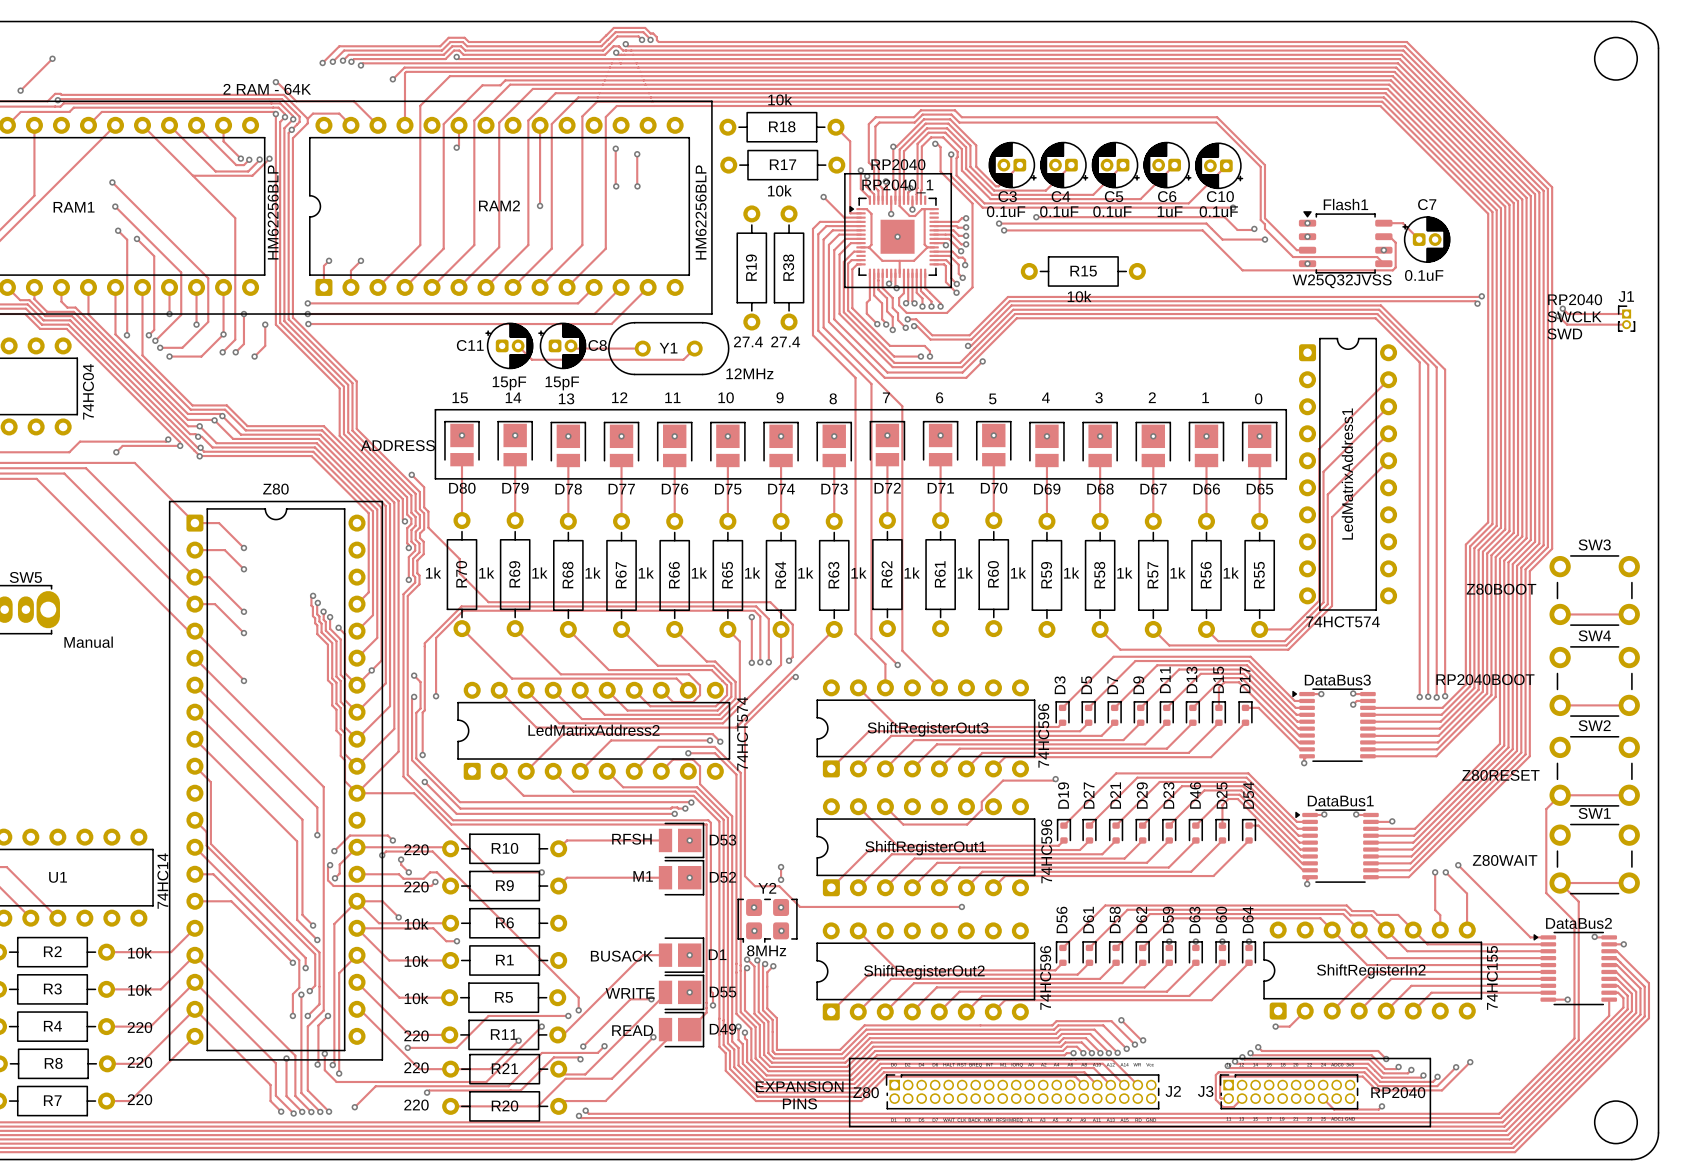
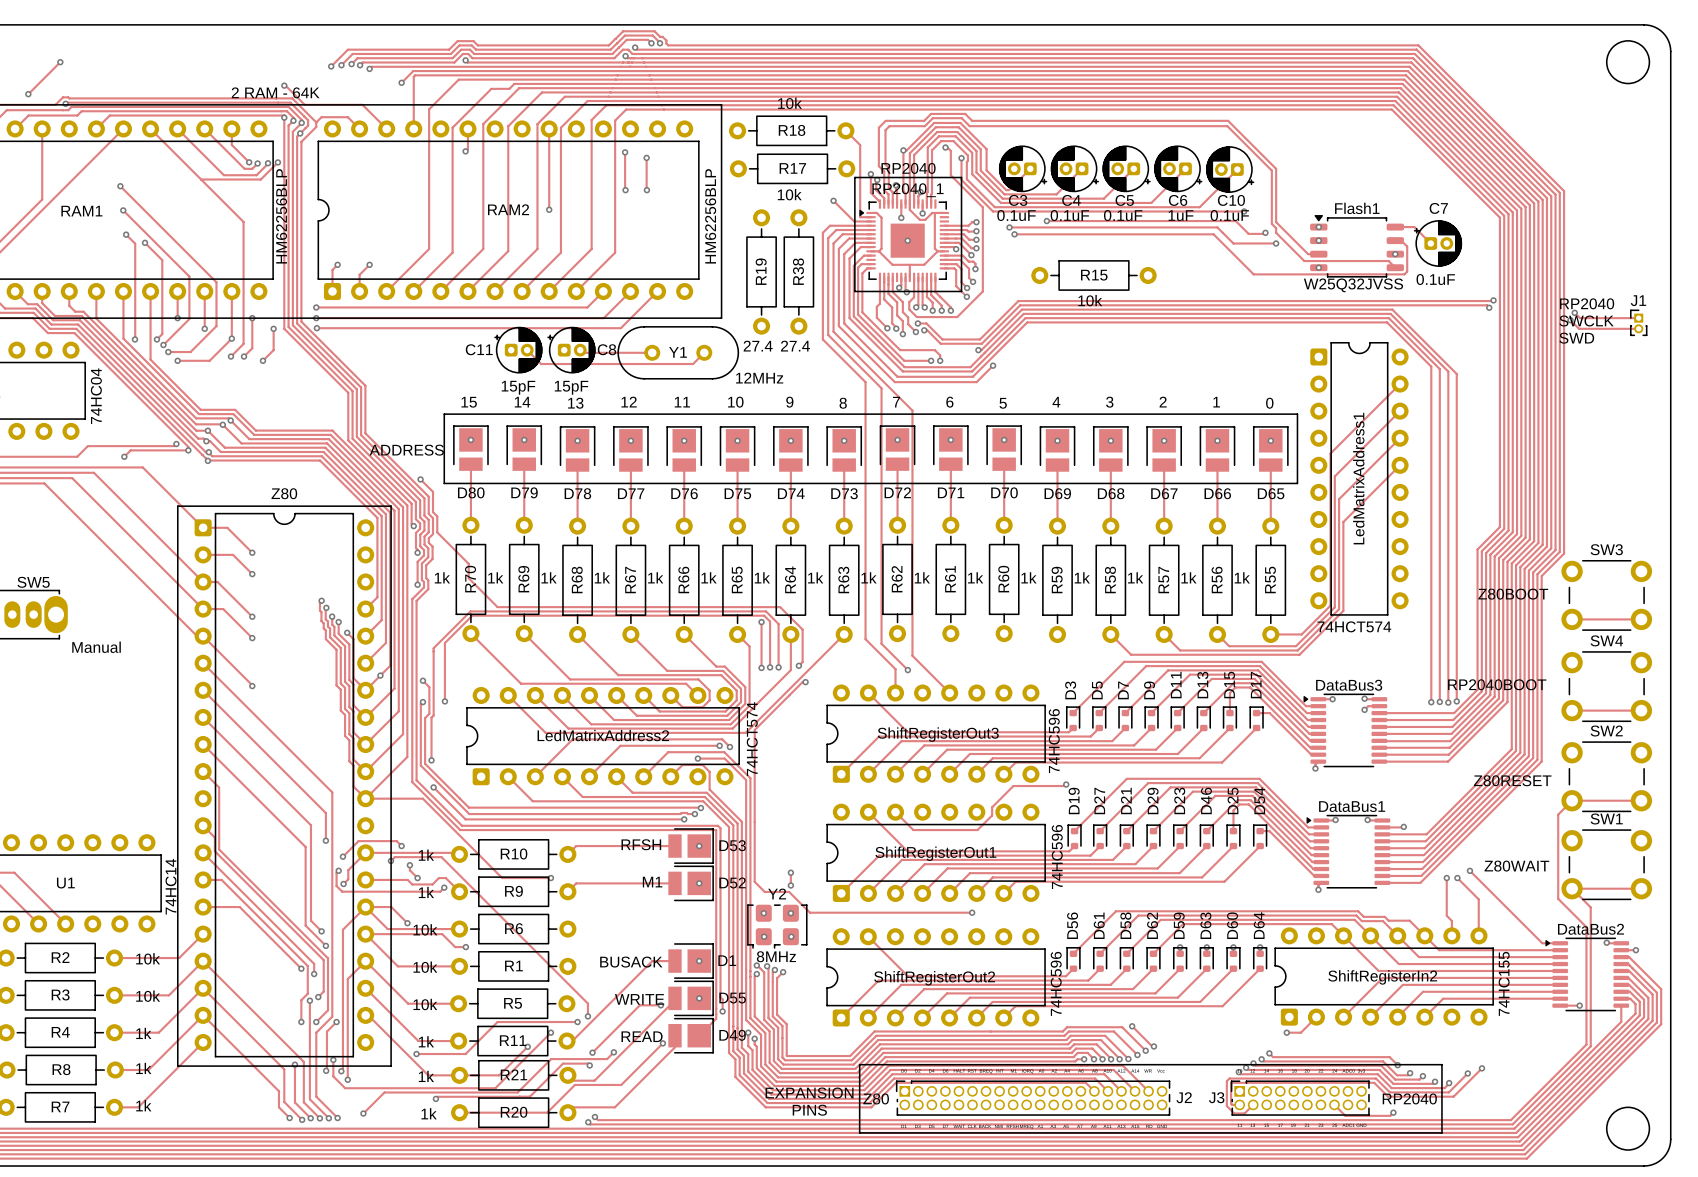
text: 220 (416, 849) -> 1k (426, 855)
text: 220 (416, 887) -> 1k (426, 892)
text: 220 (139, 1027) -> 1k (143, 1033)
text: 220 (416, 1035) -> 1k (426, 1041)
text: 220 (139, 1062) -> 1k (143, 1068)
text: 220 (416, 1067) -> 1k (426, 1076)
text: 220 (139, 1099) -> 1k (143, 1105)
text: 220 (416, 1105) -> 1k (429, 1113)

